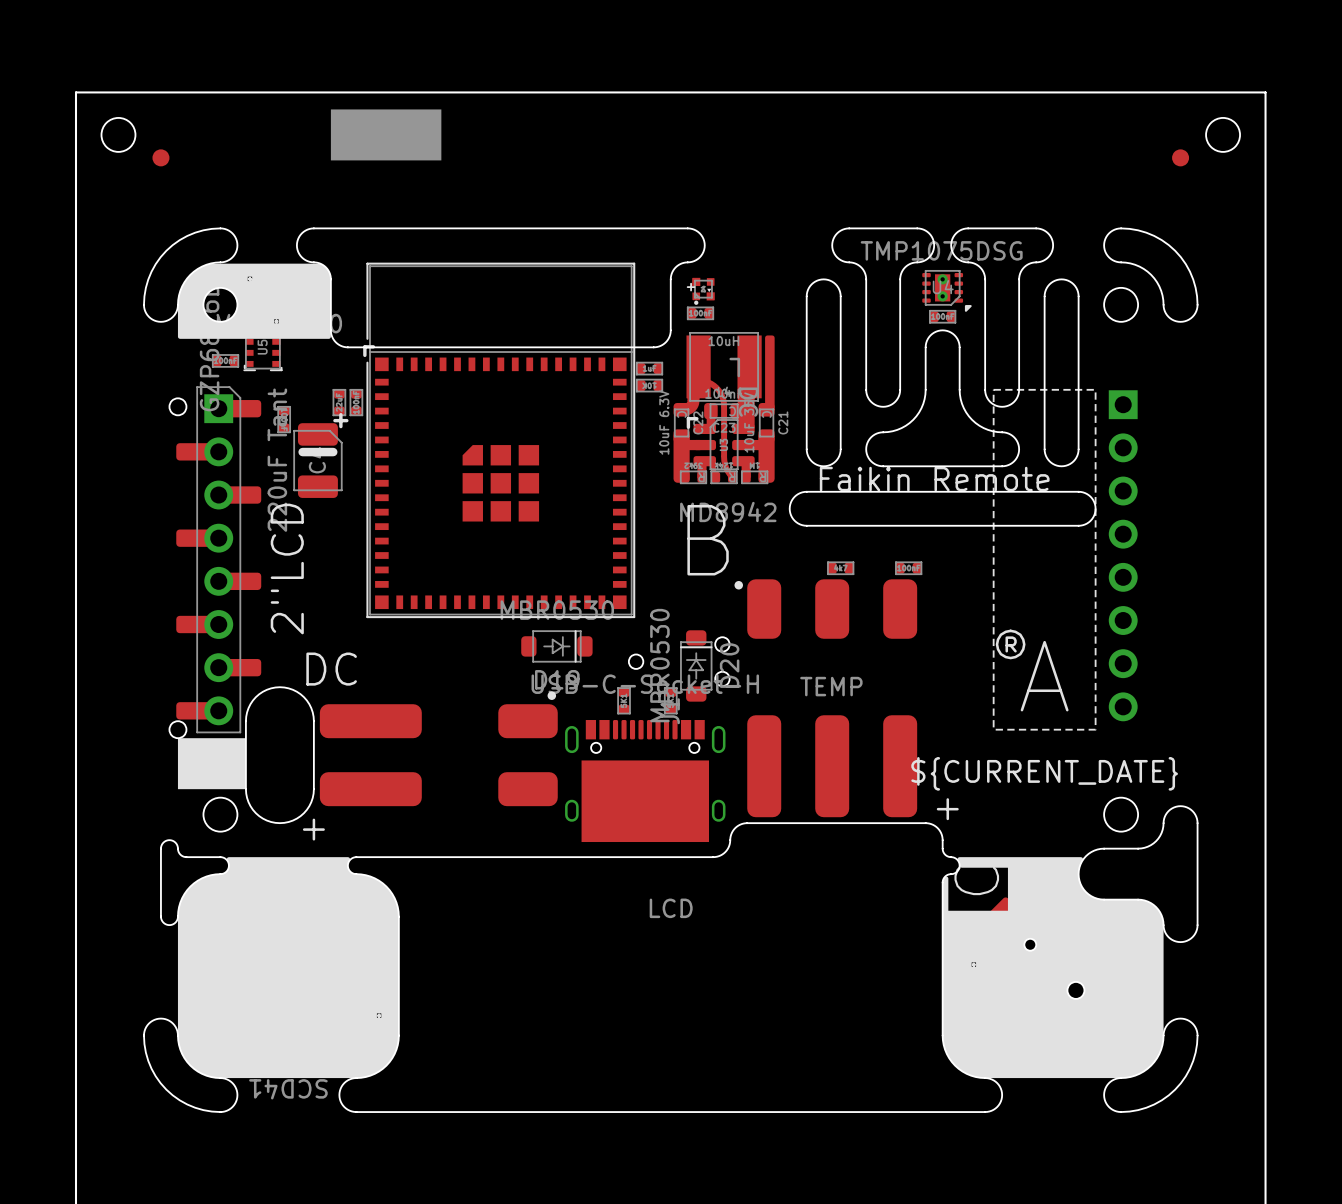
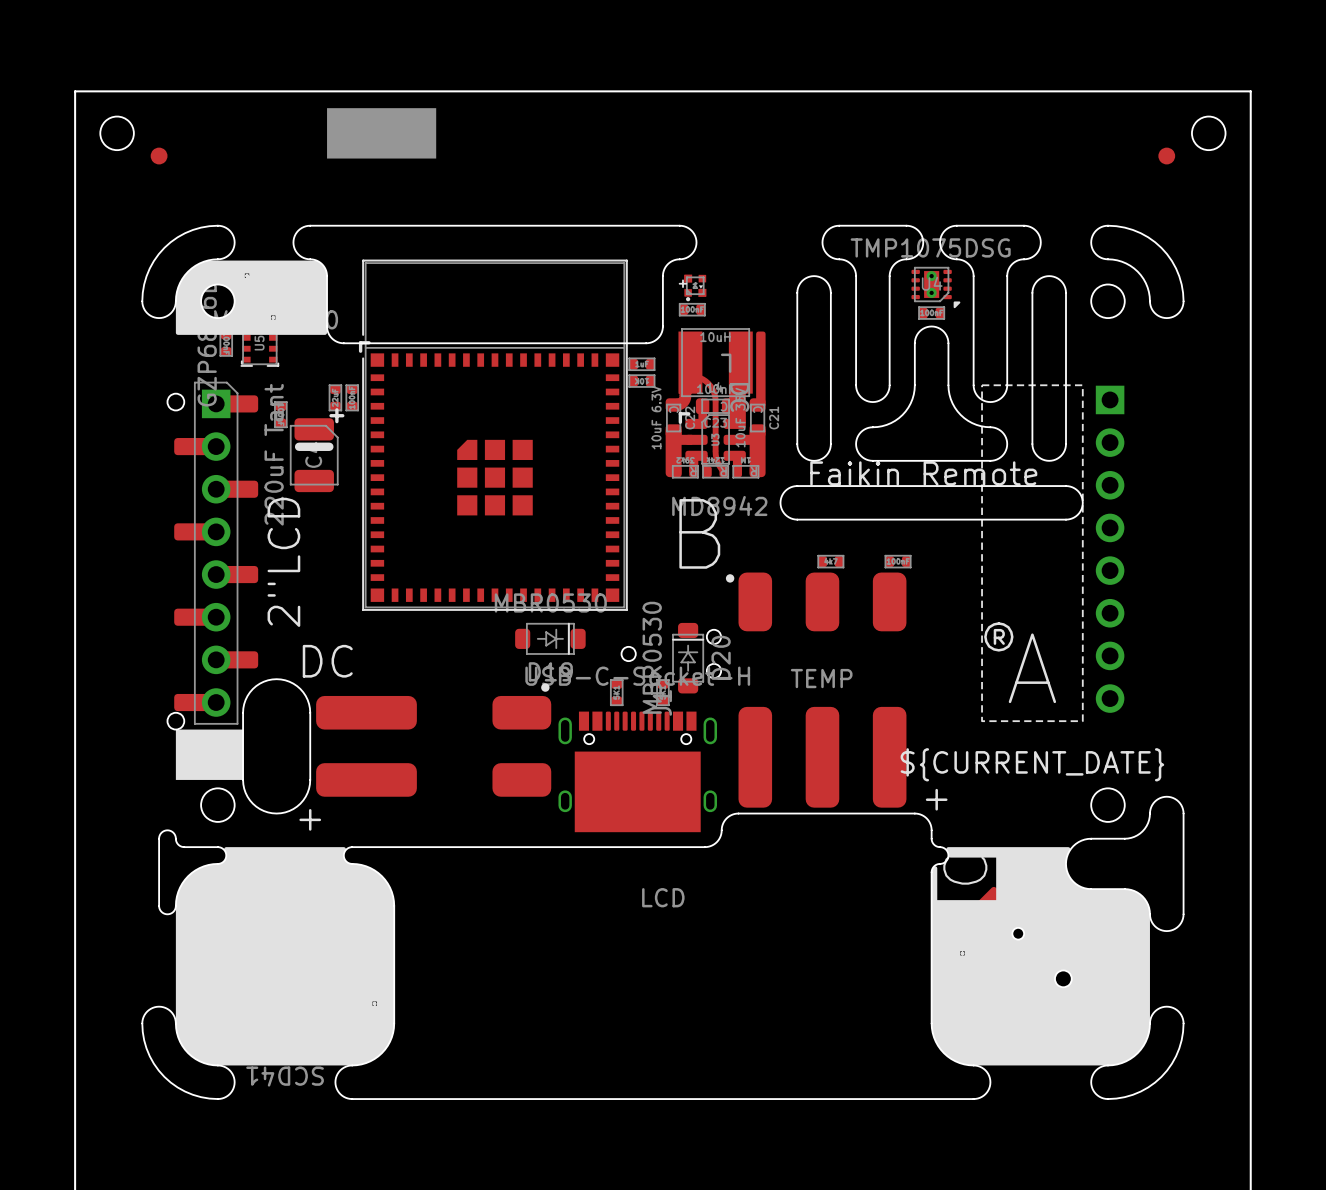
part rotation: 0° (225, 360) -> 90° clockwise (226, 343)

